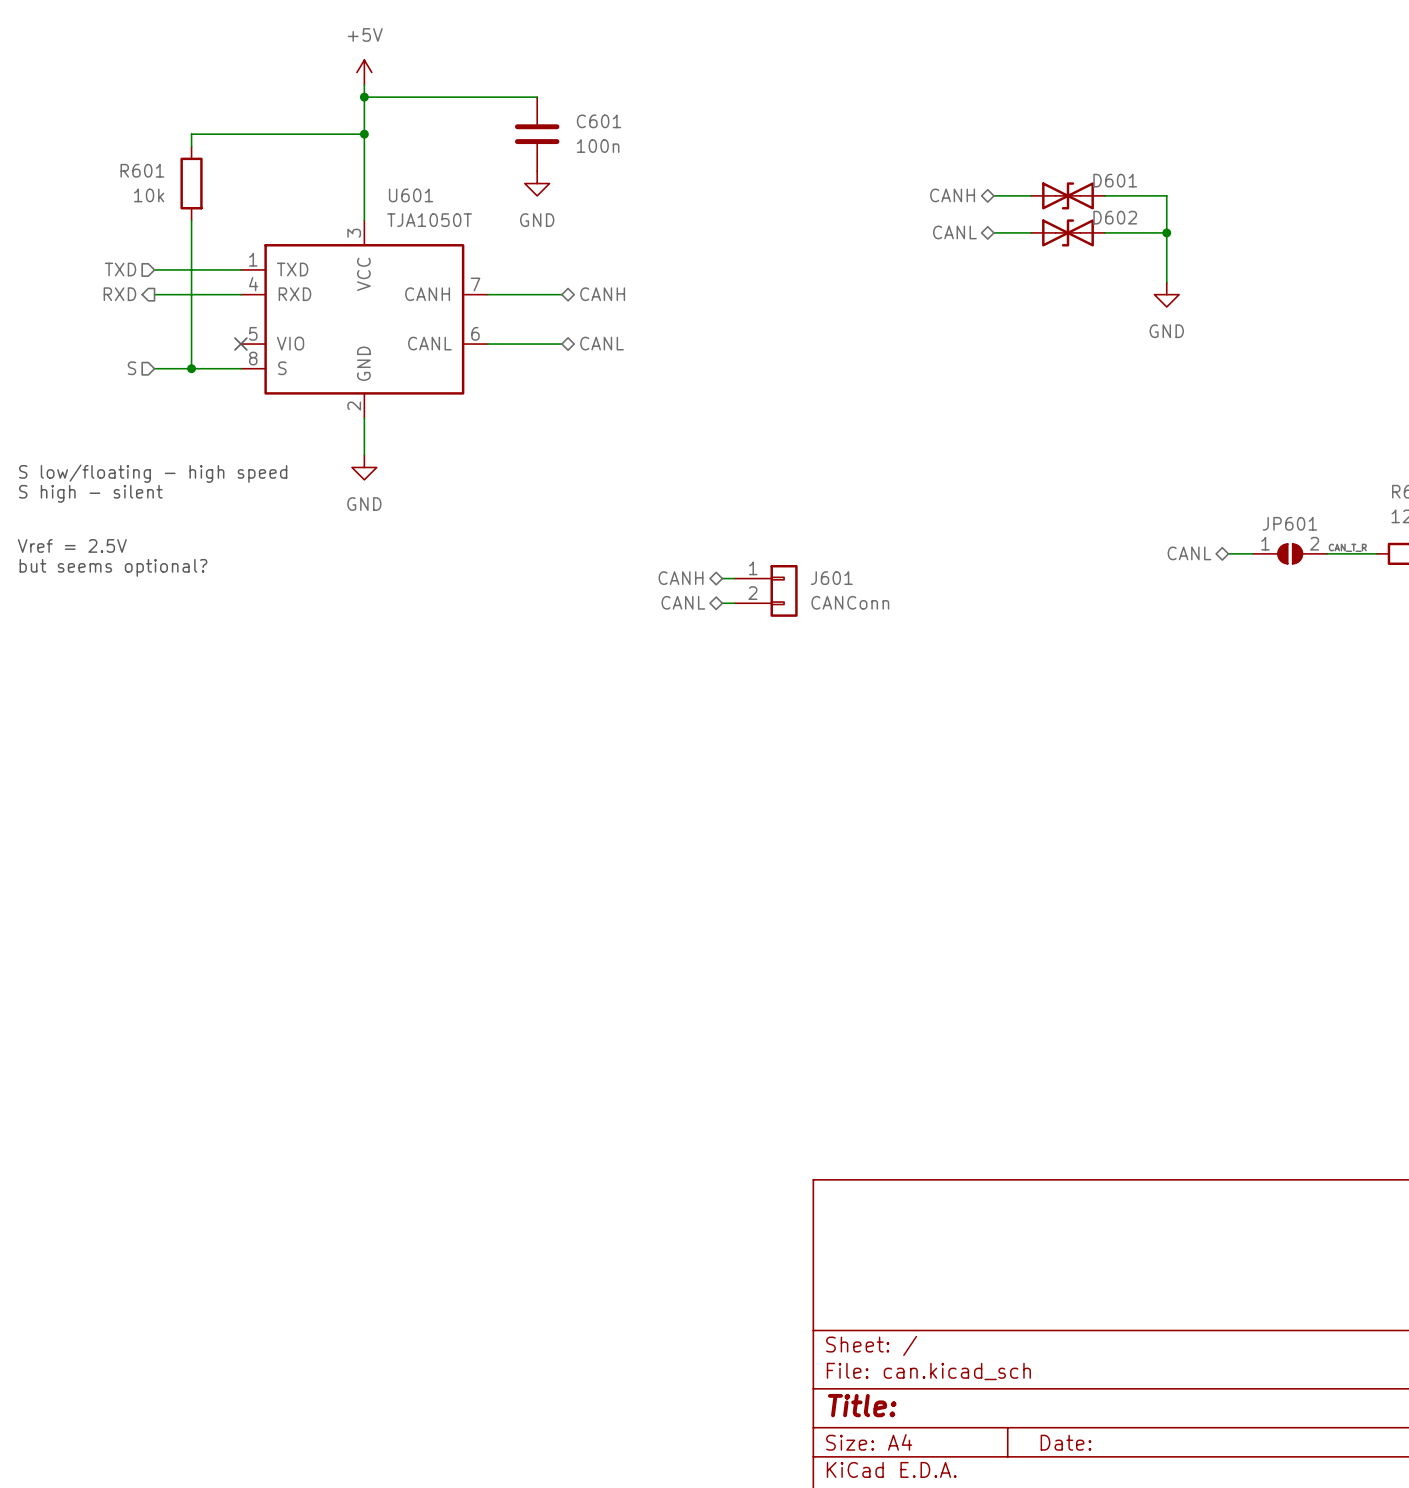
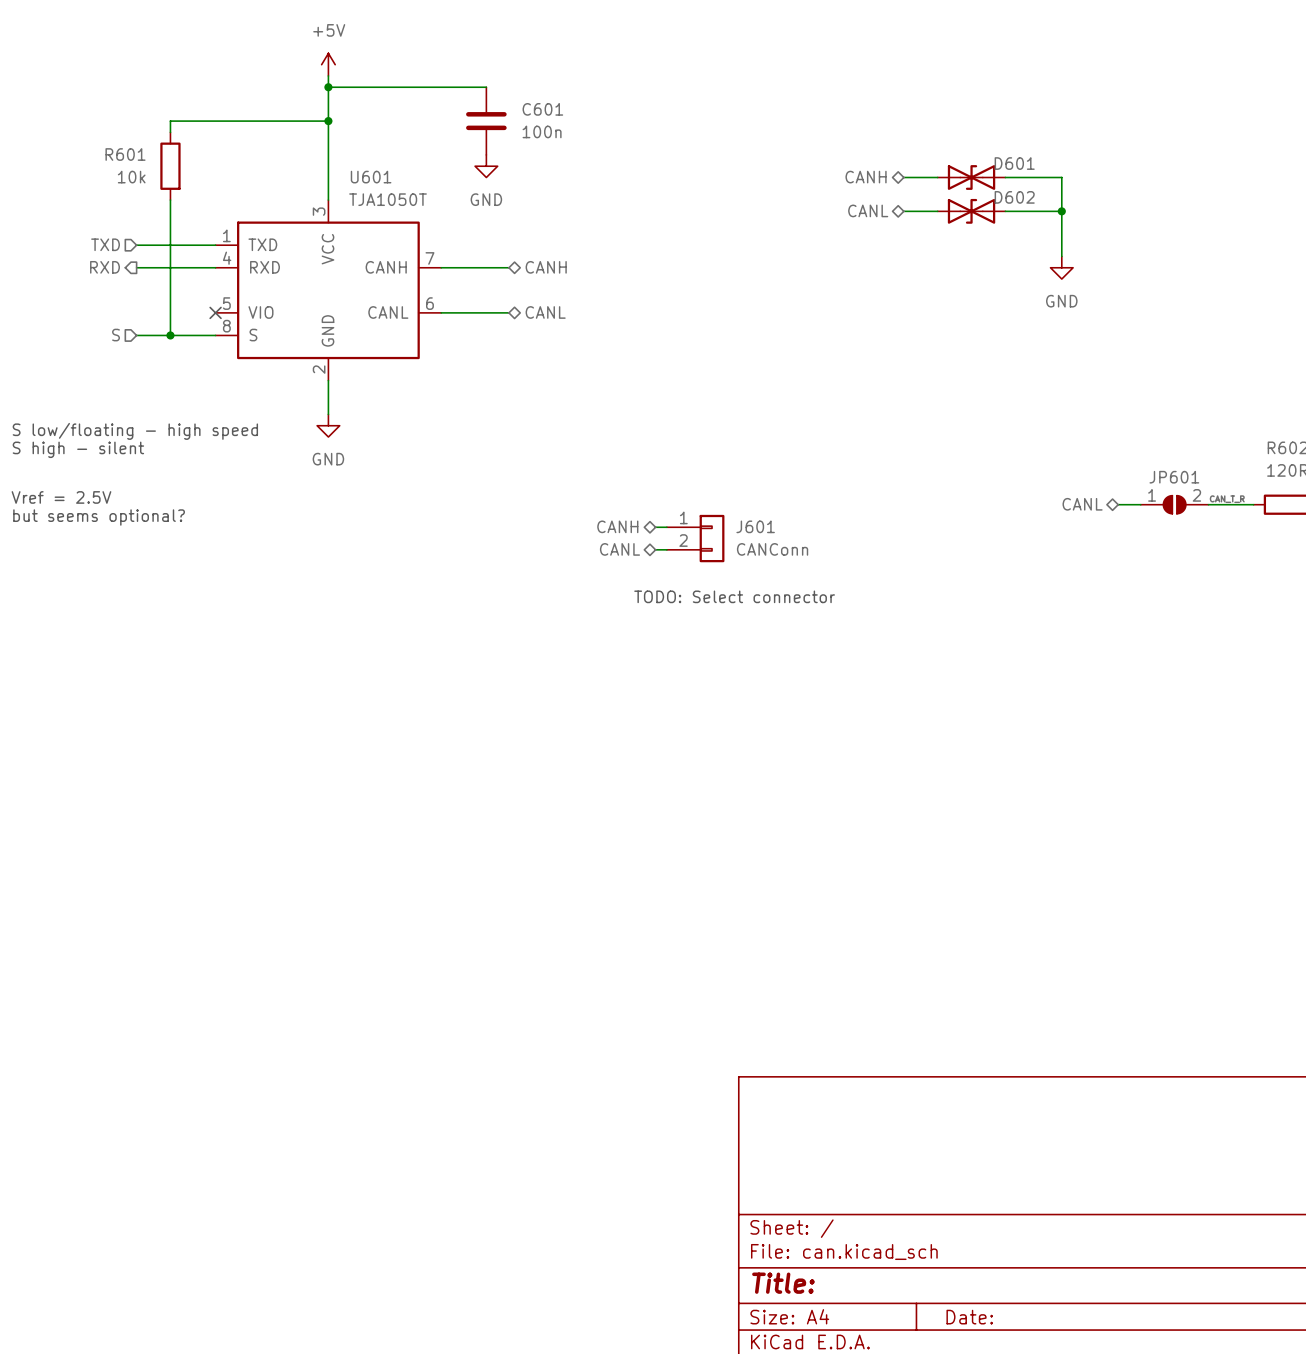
text: none -> TODO: Select connector (734, 596)

